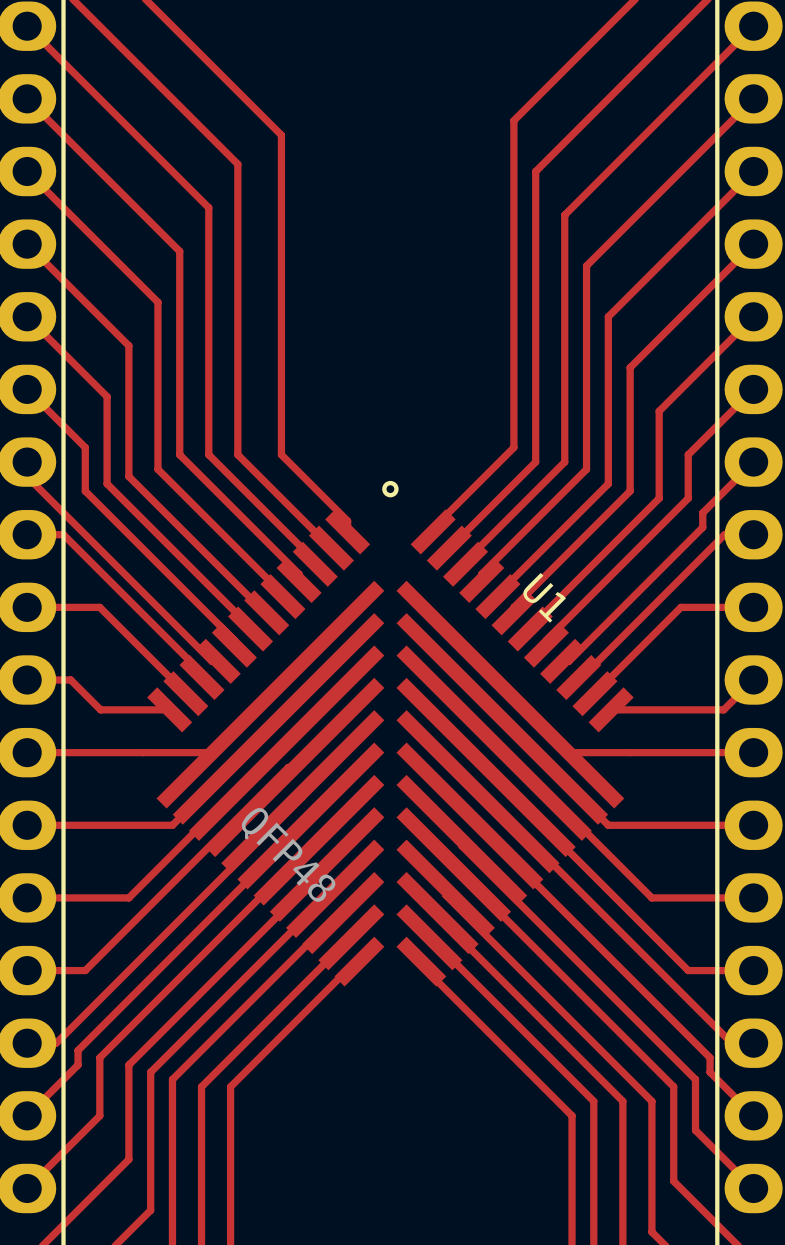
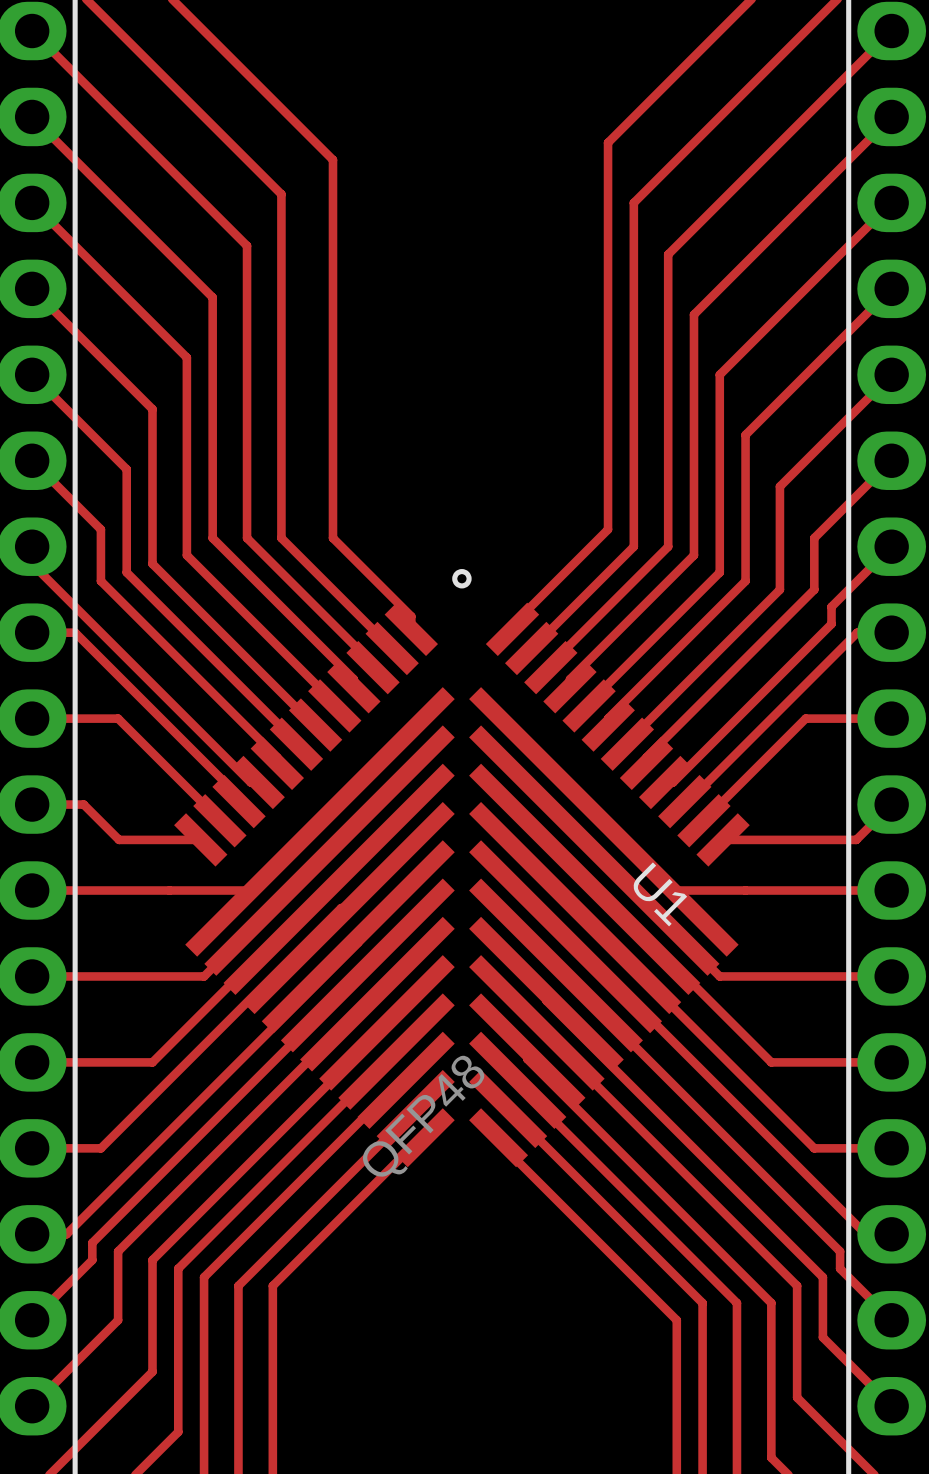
U1 name position: U1 (544, 597) -> U1 (660, 894)
U1 value rotation: 0° (288, 854) -> 90° counterclockwise (423, 1116)

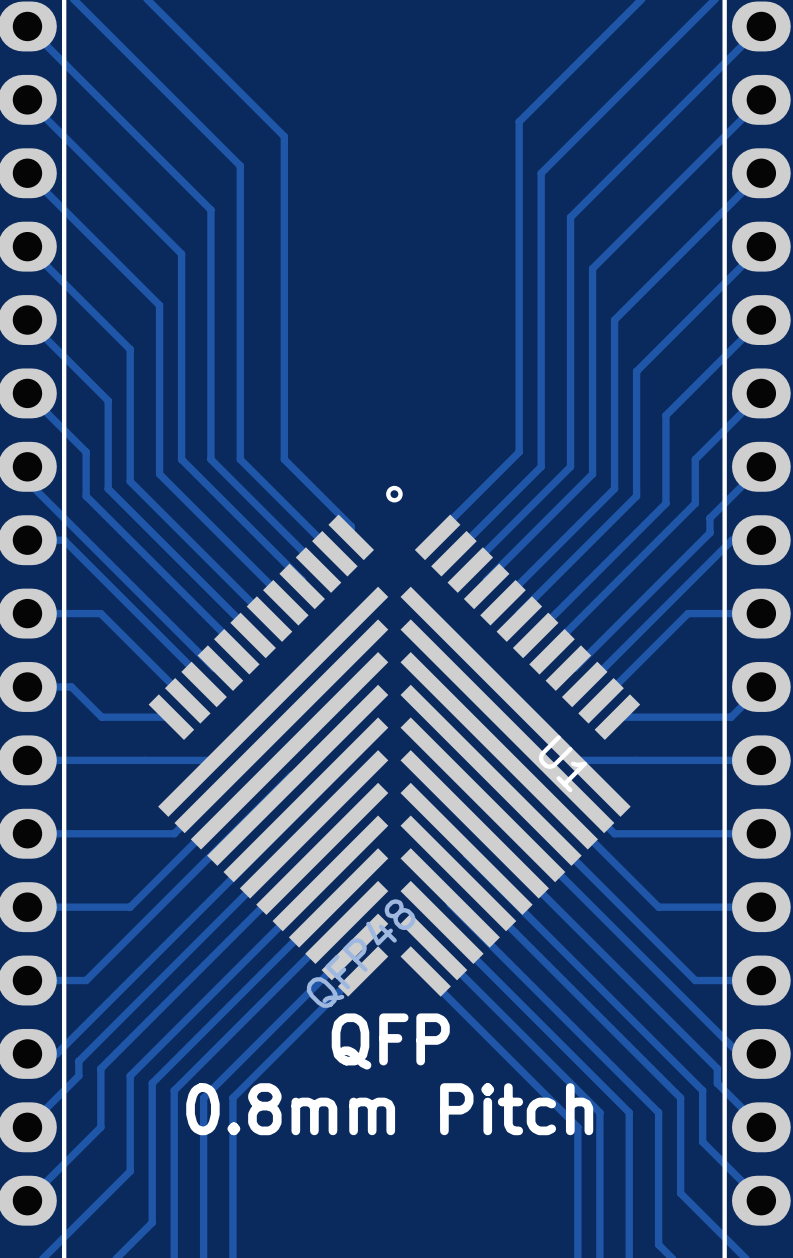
text: none -> QFP (390, 1041)
text: none -> 0.8mm Pitch (389, 1109)

